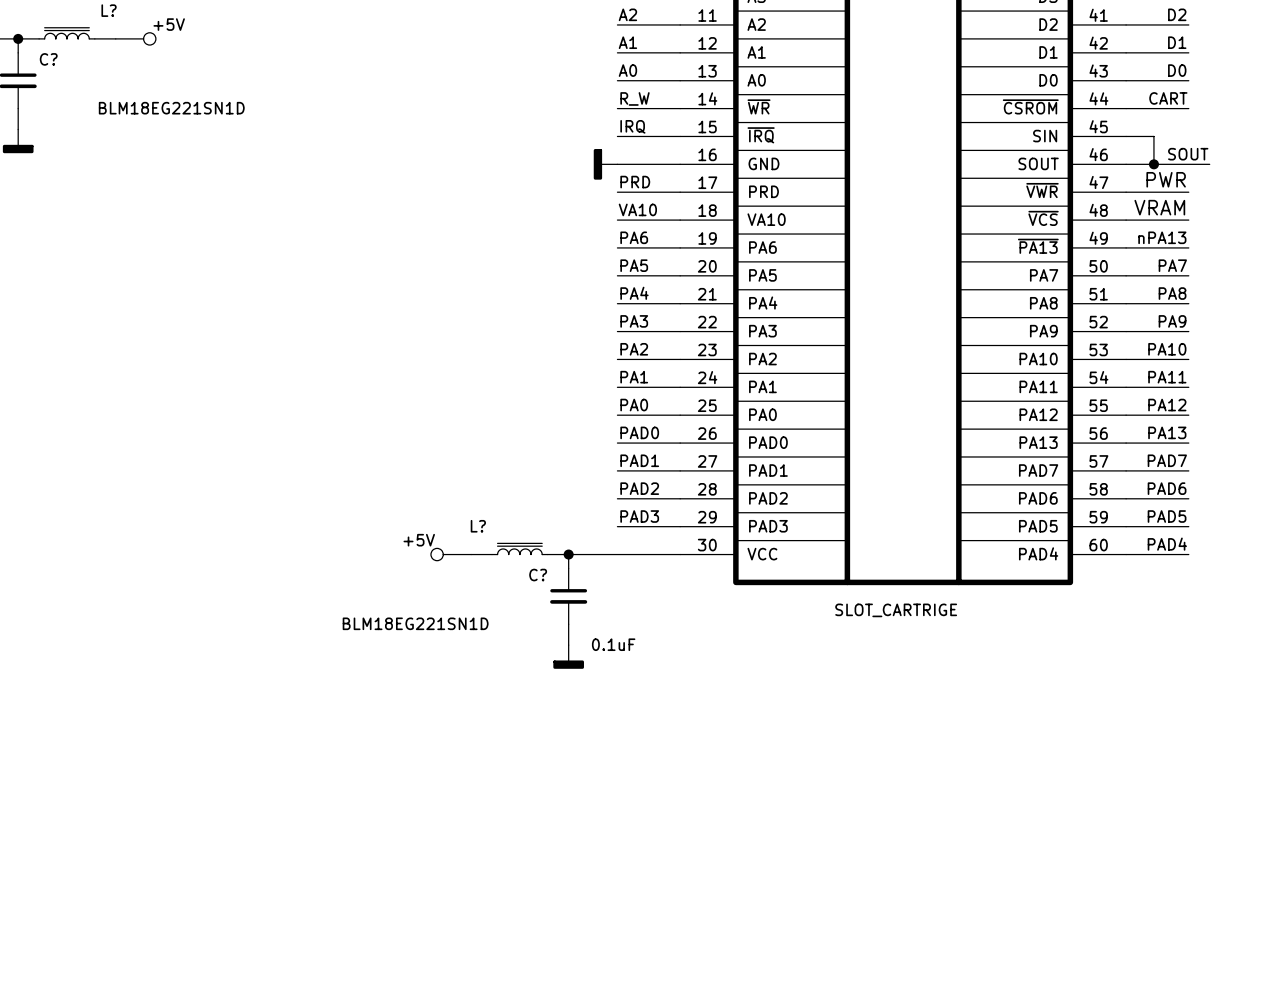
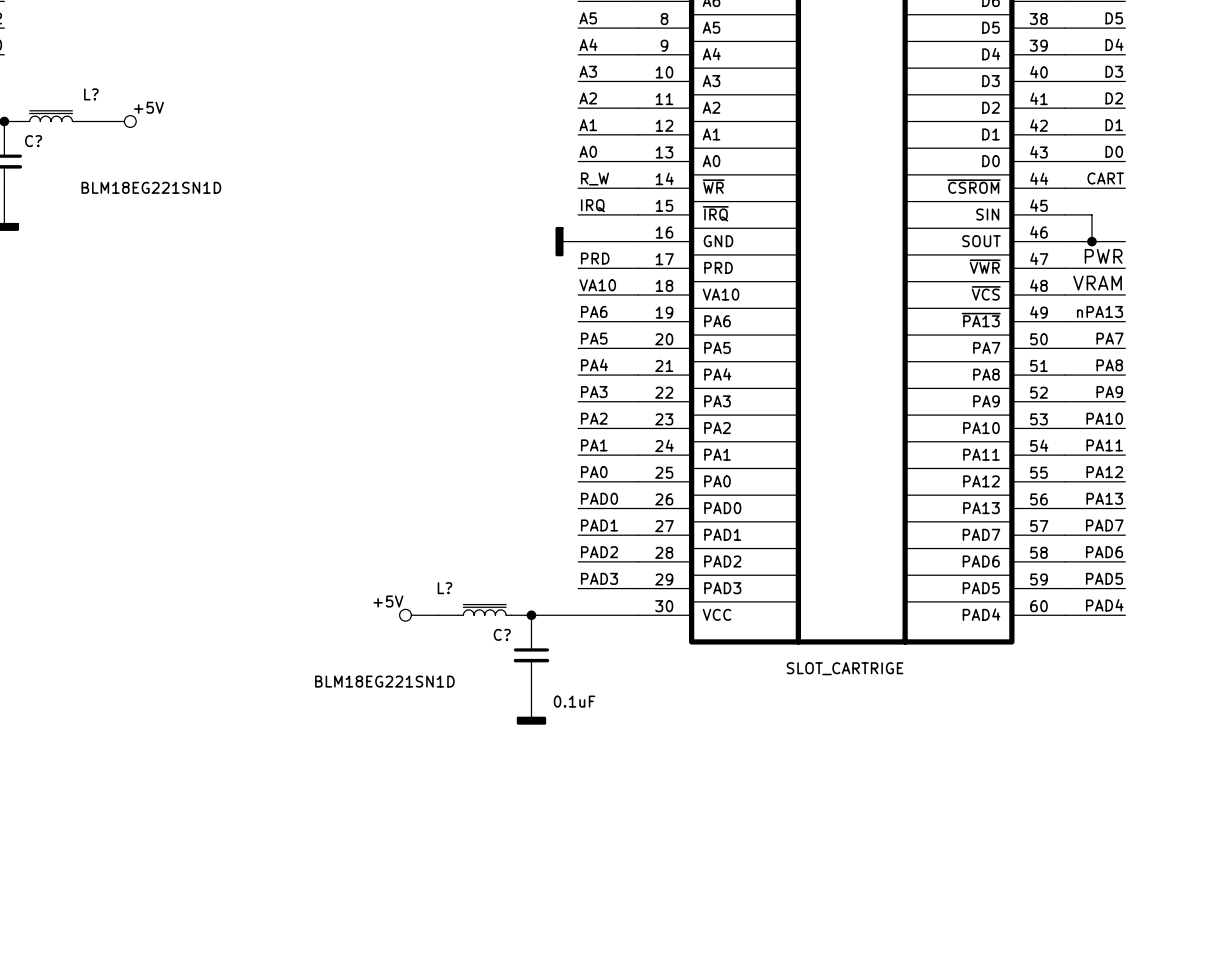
label: SOUT (1188, 154) -> none
wire: (1188, 164) (1209, 164) -> none

